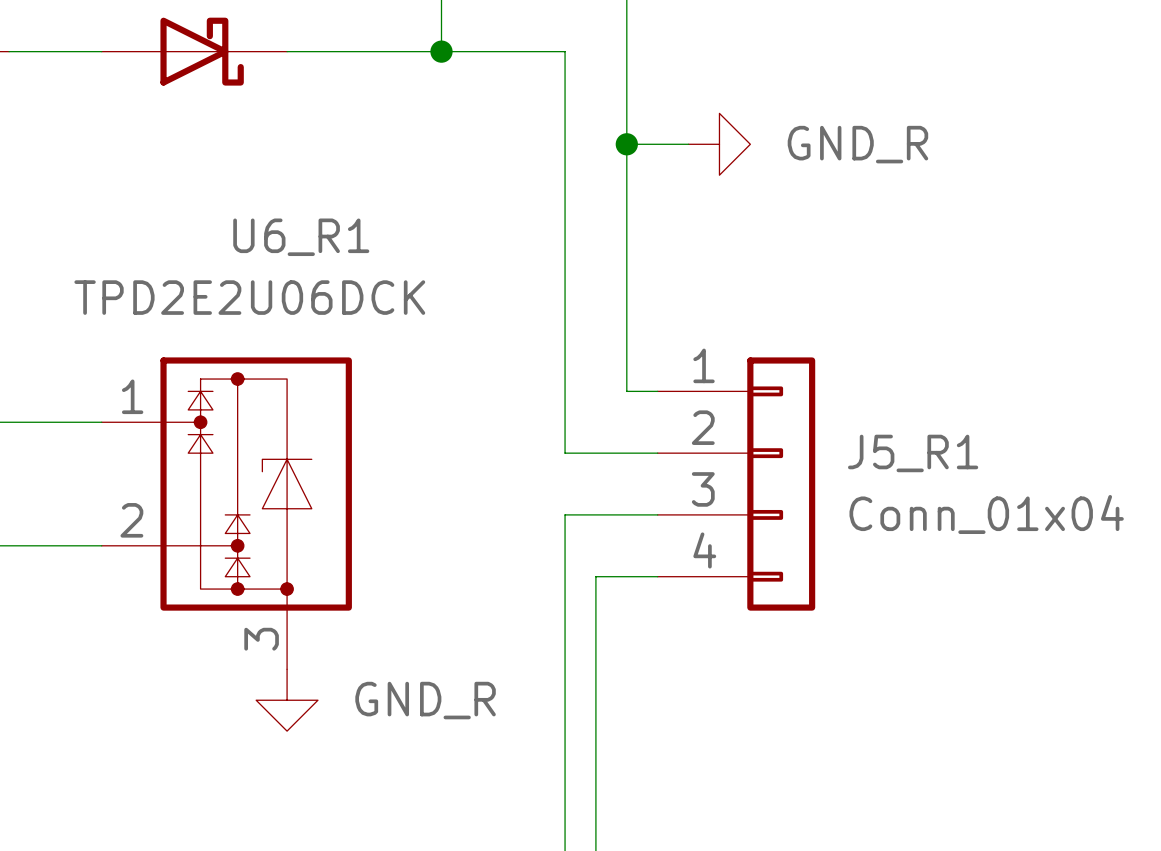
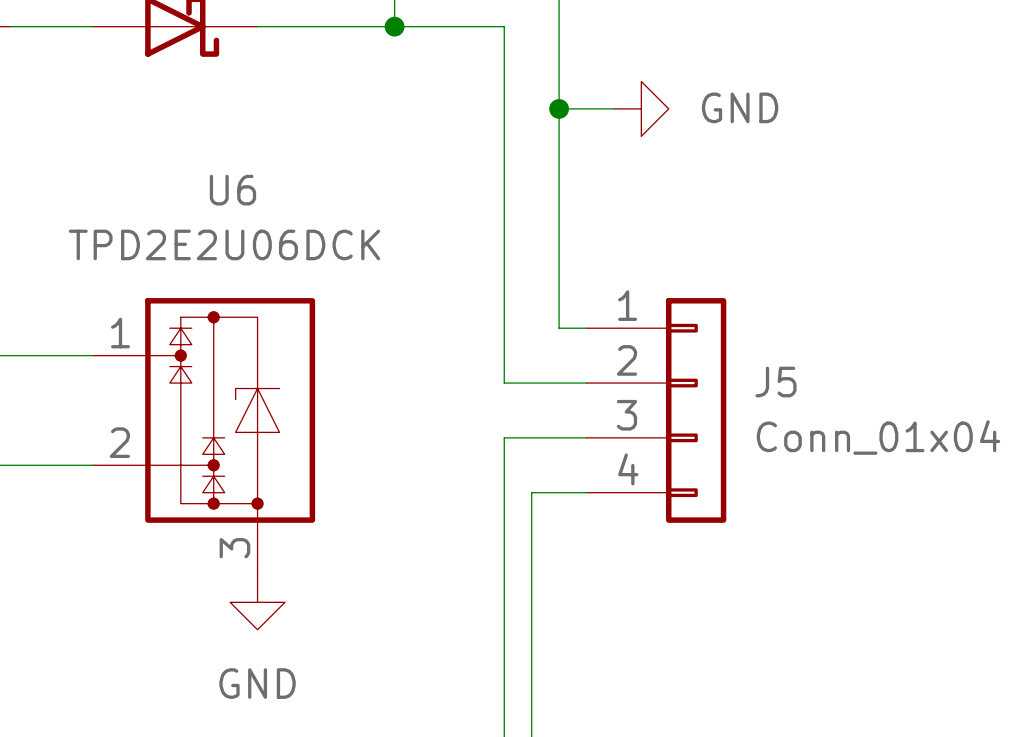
power symbol: GND_R (719, 144) -> GND (641, 108)
U6_R1 name: U6_R1 (301, 237) -> U6 (232, 190)
J5_R1 name: J5_R1 (913, 453) -> J5 (775, 382)
power symbol: GND_R (287, 700) -> GND (257, 602)

